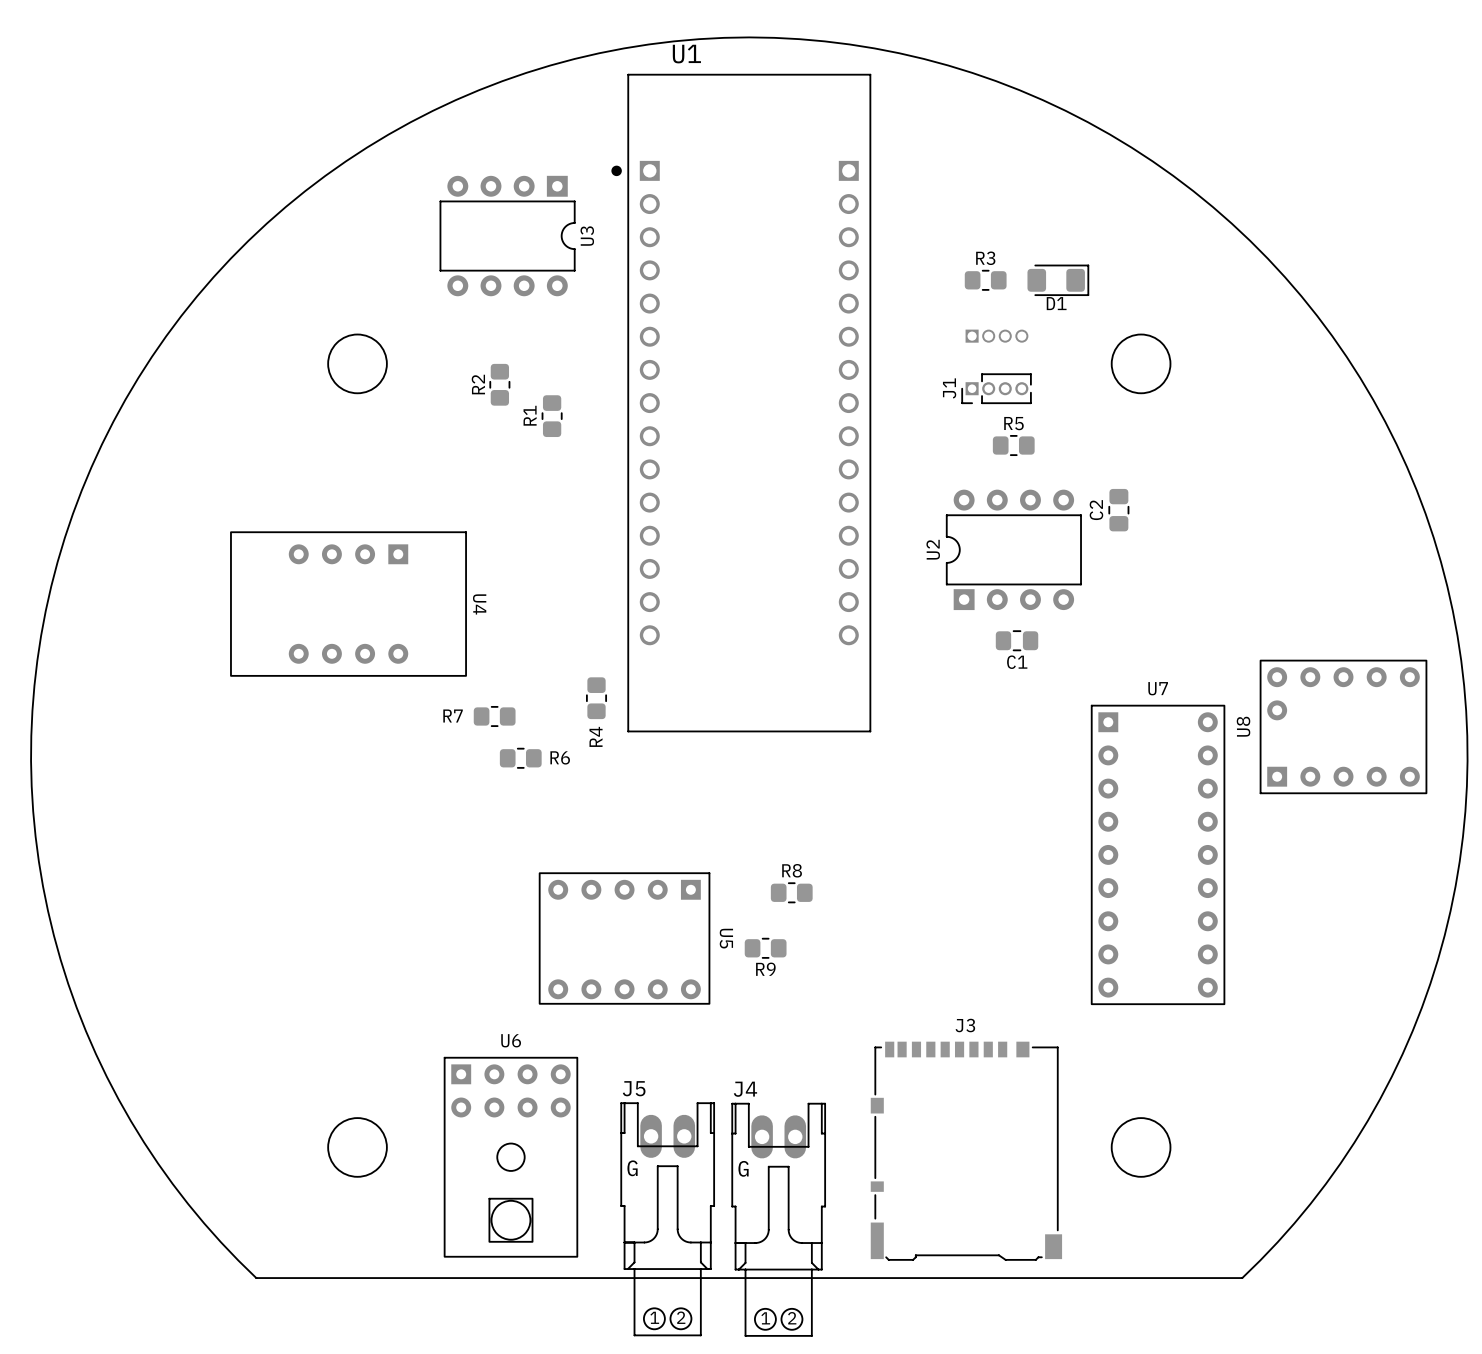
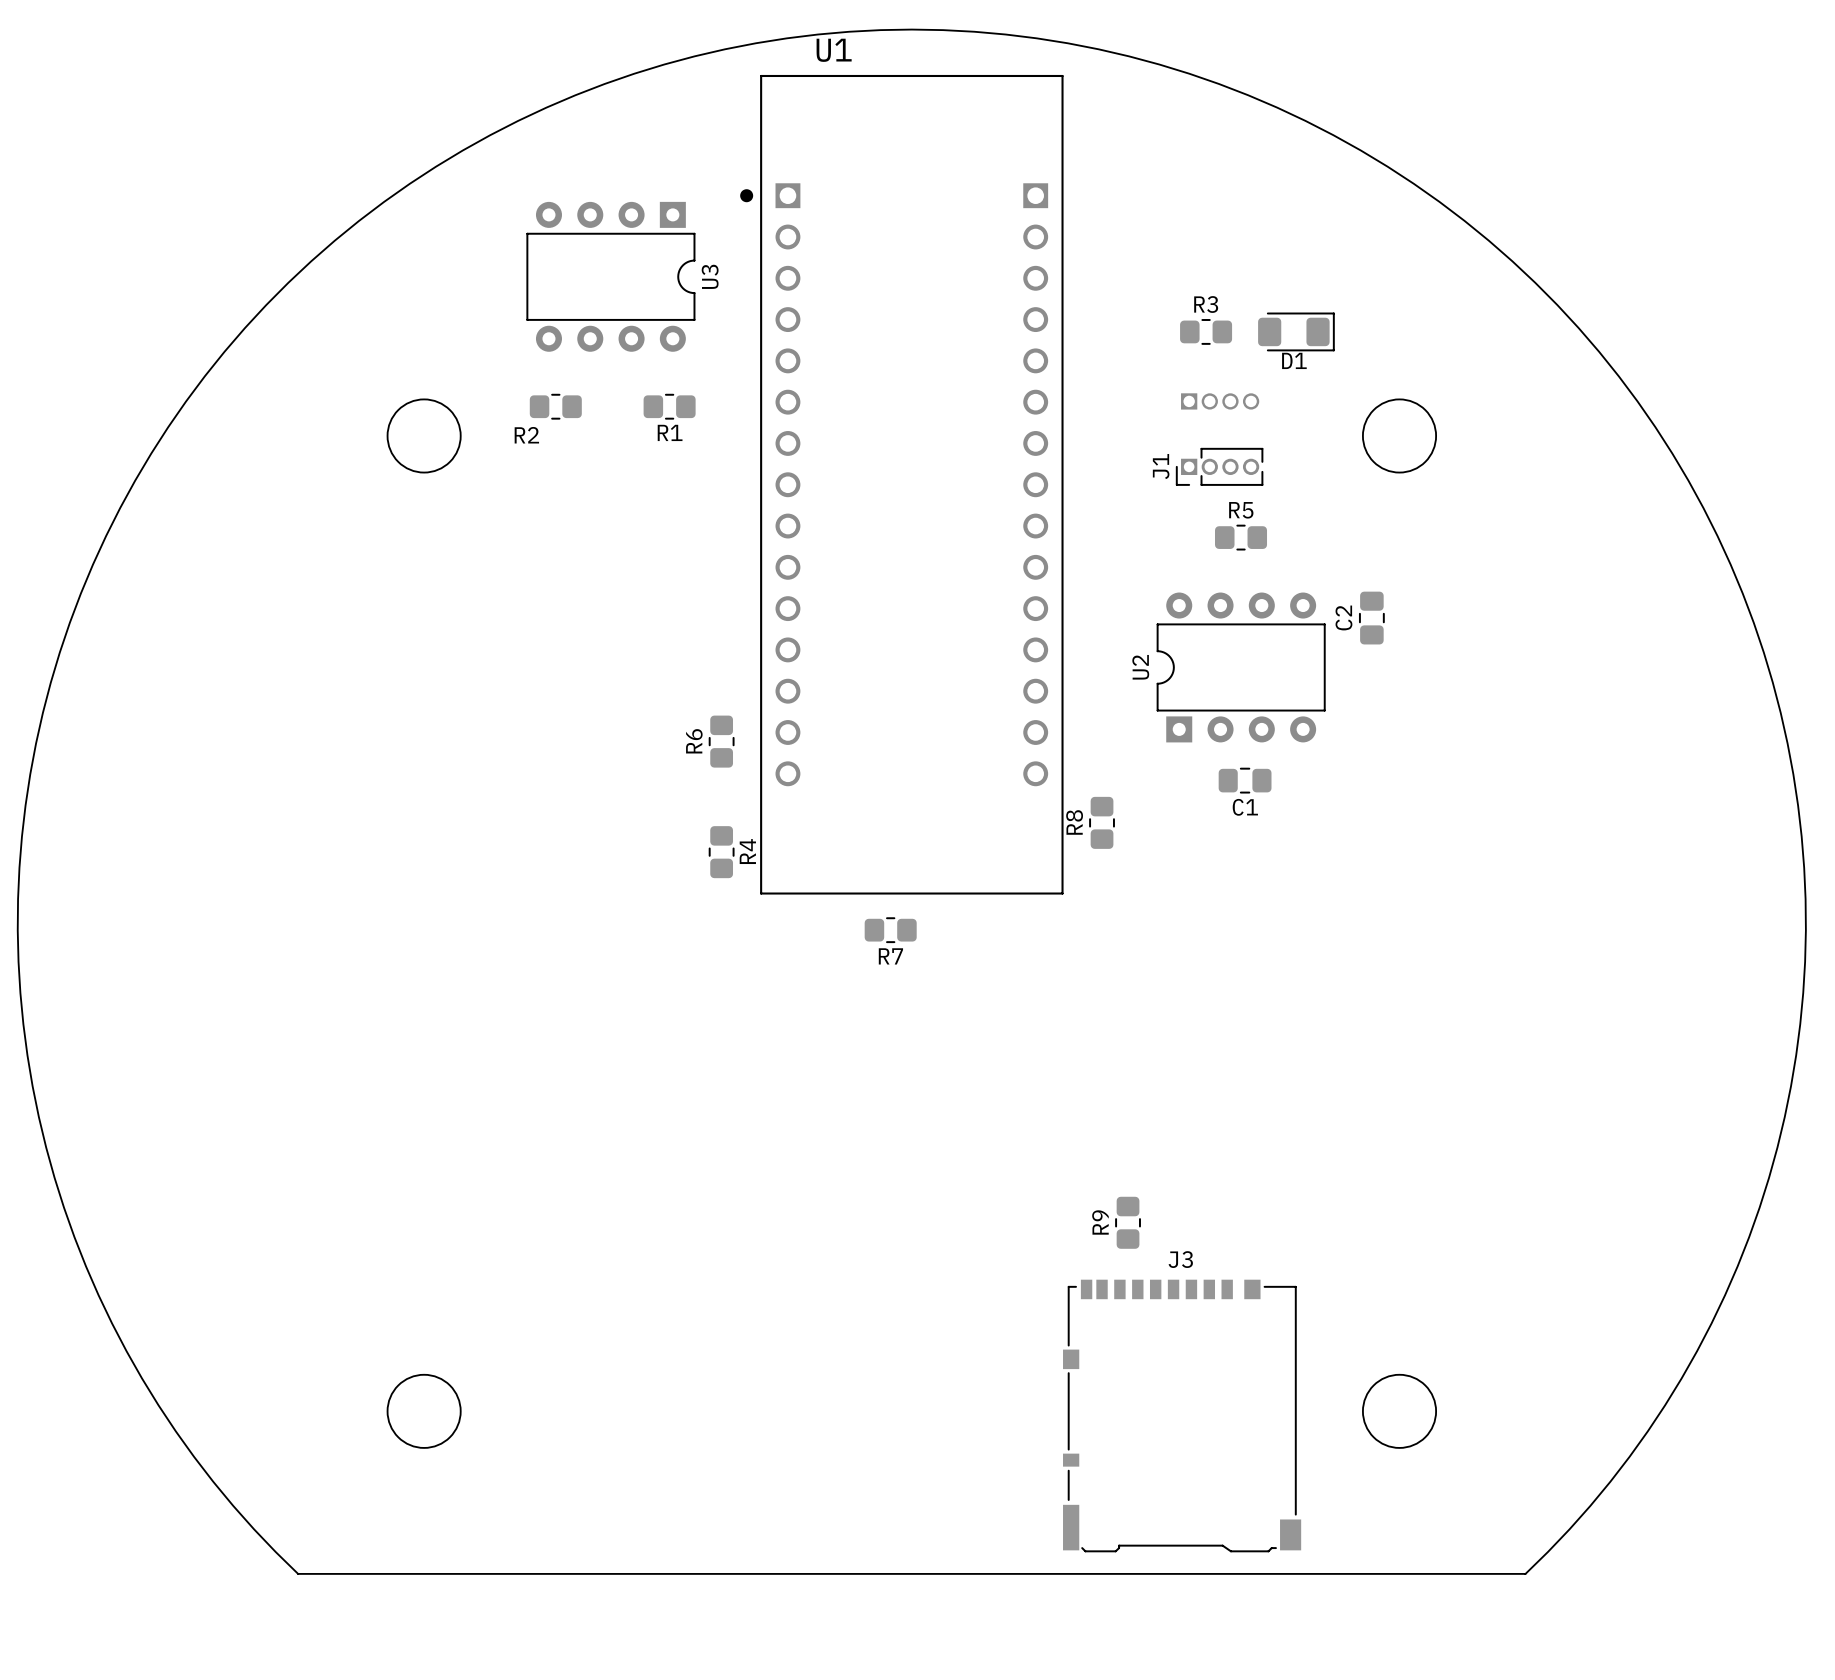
R2 rotation: 0° (499, 384) -> 90° clockwise (555, 406)
R2 position: (499, 384) -> (555, 406)
R1 name position: R1 (530, 415) -> R1 (670, 432)
R1 rotation: 0° (552, 416) -> 90° clockwise (669, 406)
R1 position: (552, 416) -> (669, 406)
U4: (348, 604) -> none
R7 name position: R7 (453, 716) -> R7 (890, 956)
R7 position: (494, 716) -> (890, 930)
U8: (1343, 726) -> none
R4 name position: R4 (596, 736) -> R4 (747, 851)
R6 name position: R6 (560, 757) -> R6 (694, 741)
R6 rotation: 0° (520, 758) -> 90° clockwise (721, 741)
R6 position: (520, 758) -> (721, 741)
U7: (1158, 854) -> none
R8 name position: R8 (792, 870) -> R8 (1074, 822)
R8 rotation: 0° (791, 892) -> 90° clockwise (1102, 822)
R8 position: (791, 892) -> (1102, 822)
U5: (624, 938) -> none
R9 rotation: 0° (765, 948) -> 90° clockwise (1128, 1222)
R9 position: (765, 948) -> (1128, 1222)
U6: (510, 1157) -> none
J5: (667, 1219) -> none
J4: (778, 1219) -> none

